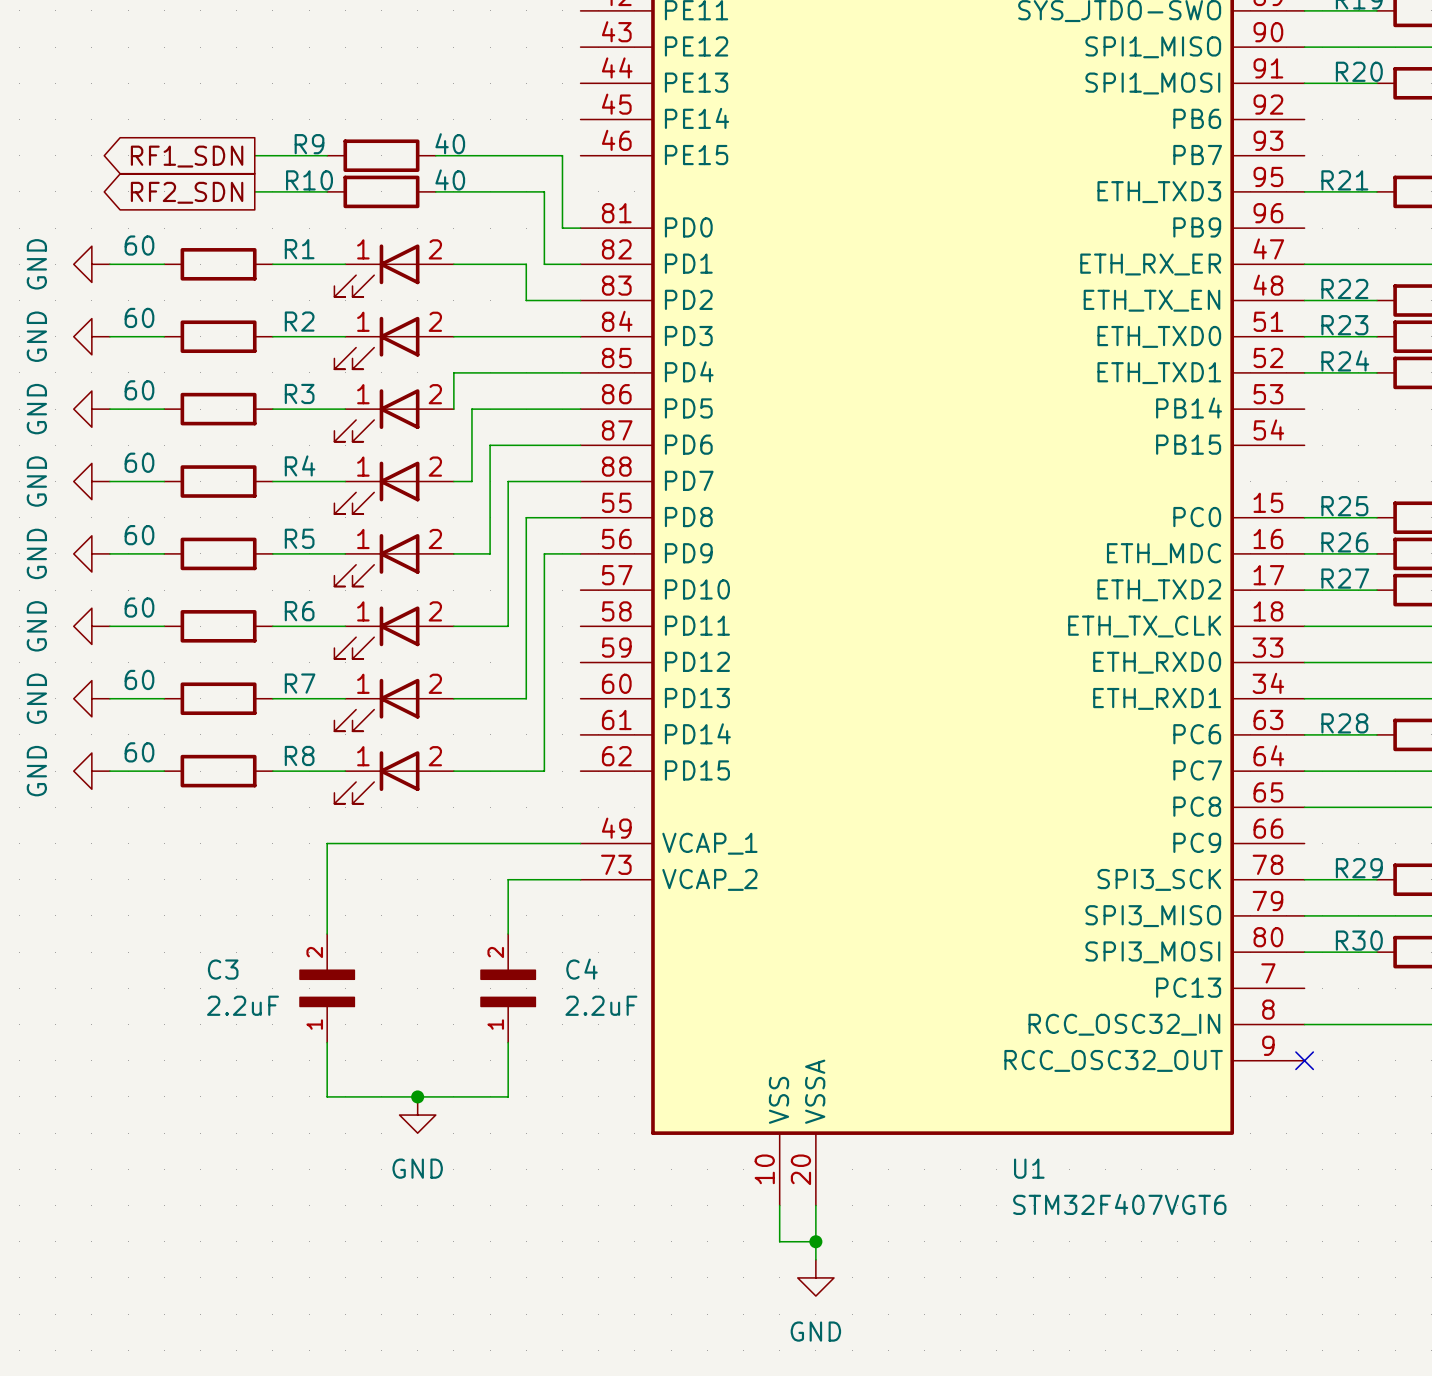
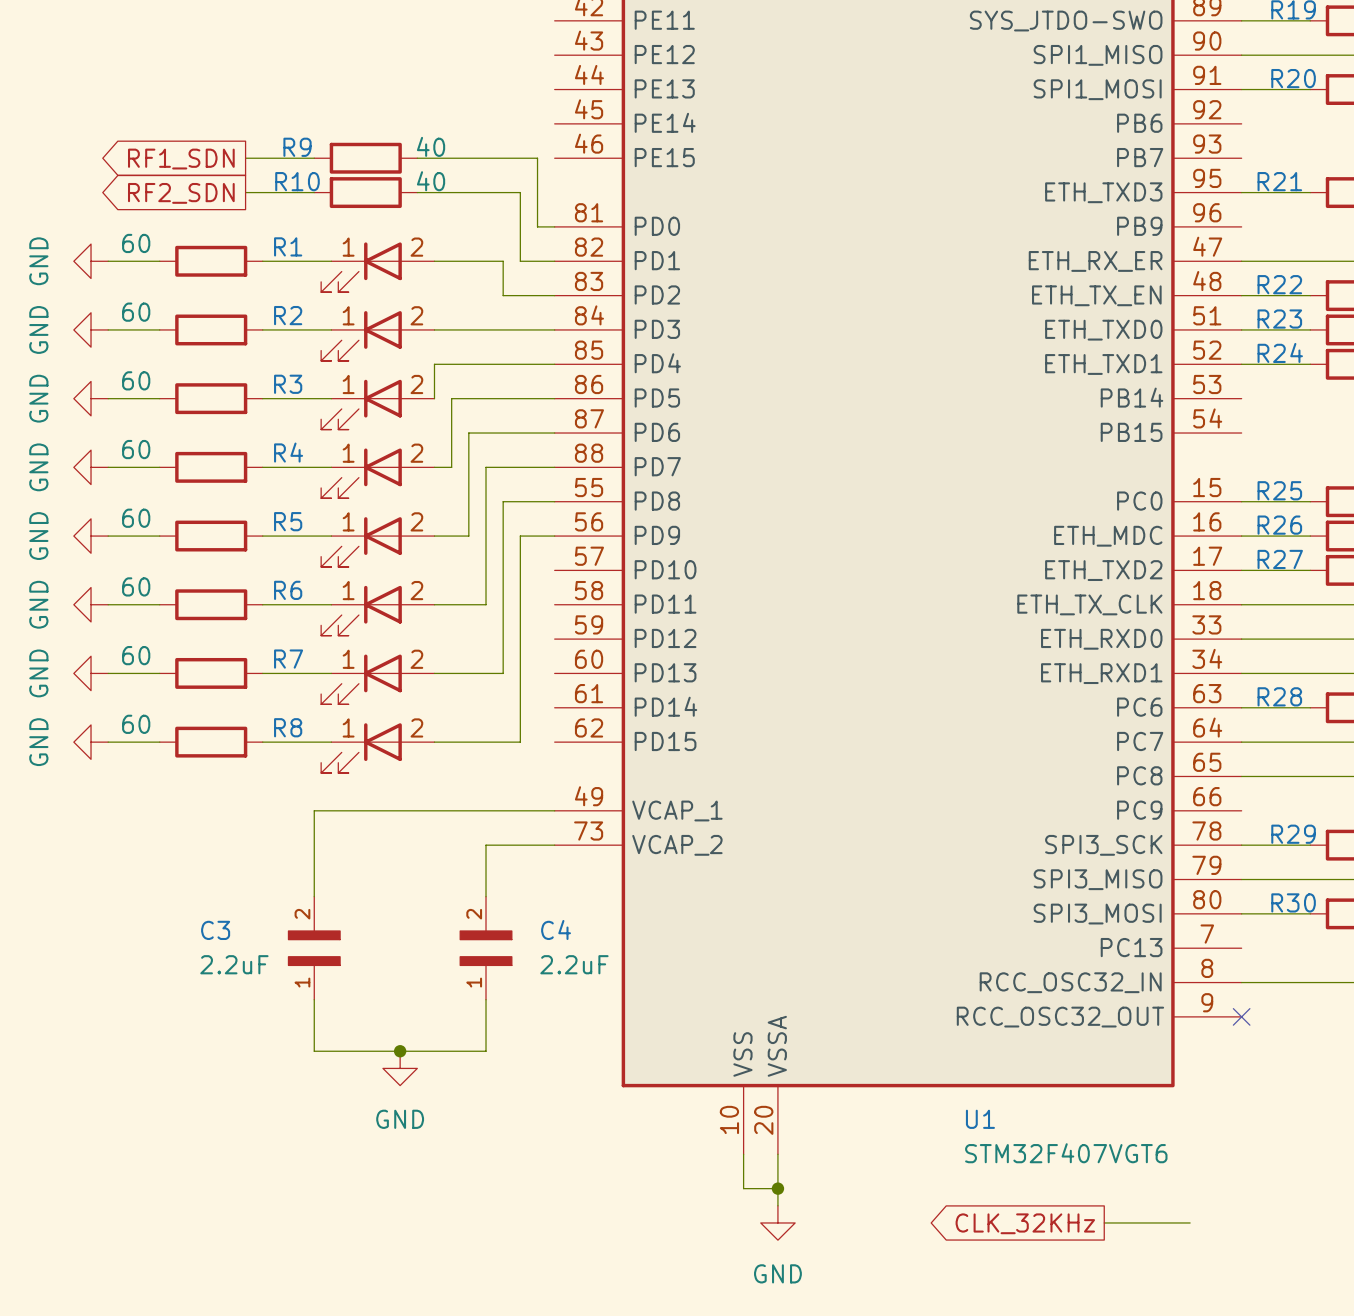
wire: none -> (1104, 1222) (1190, 1222)
global label: none -> CLK_32KHz (1025, 1223)

